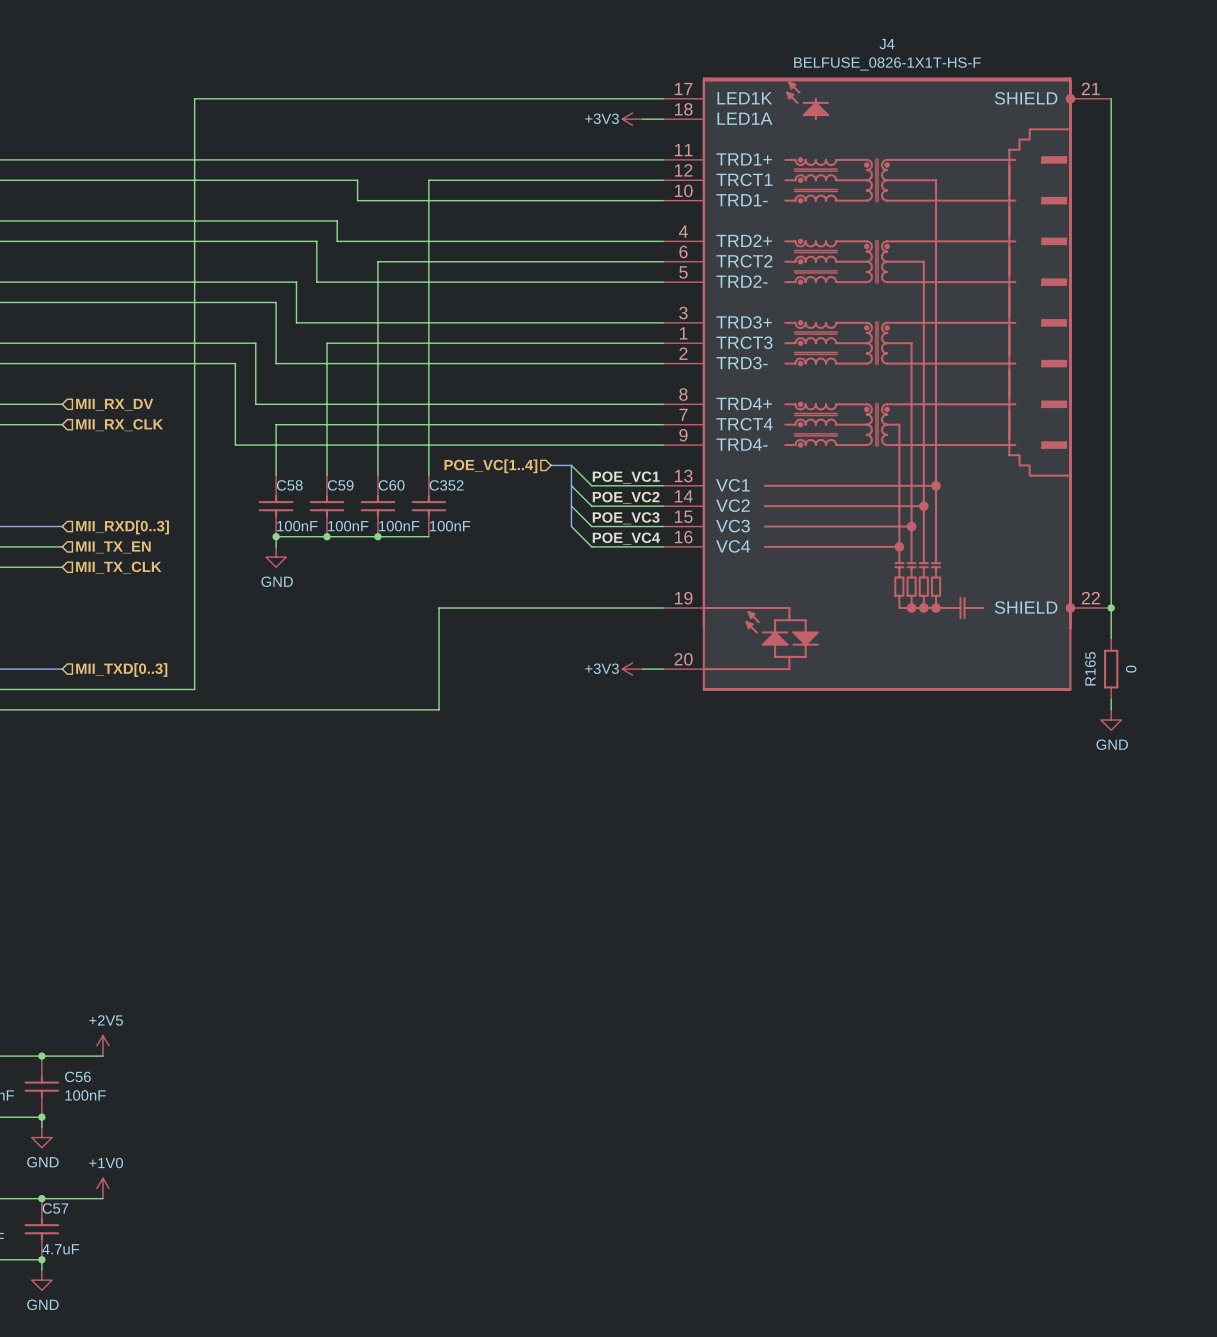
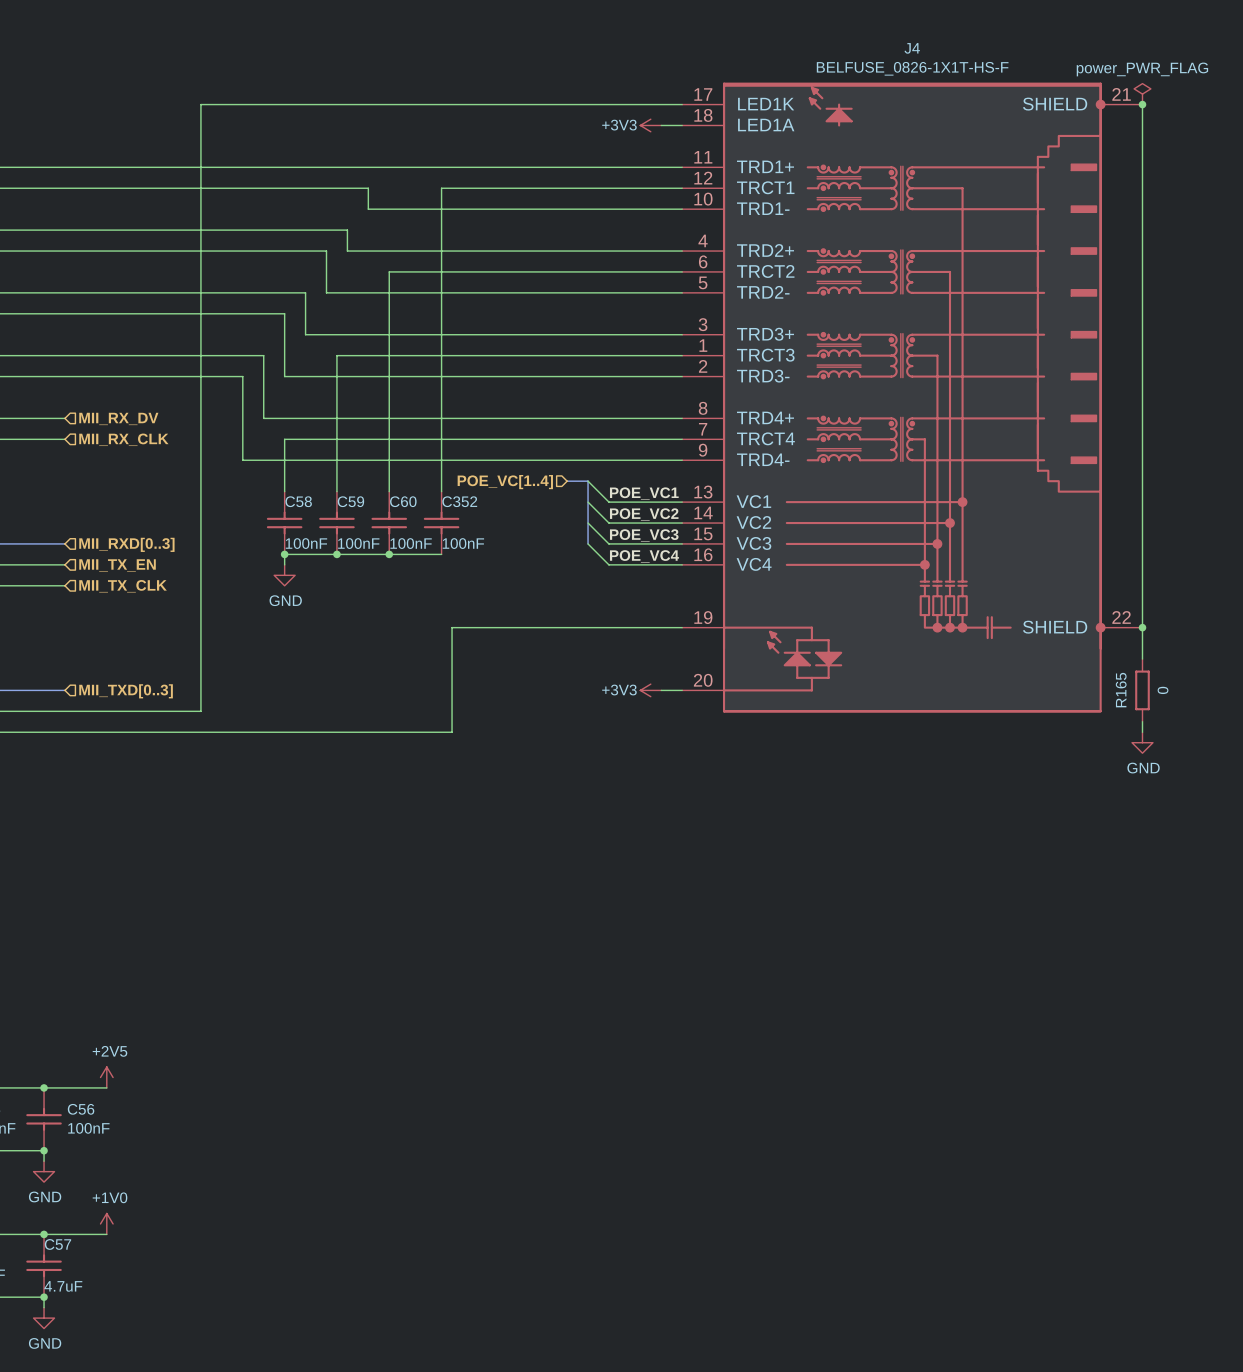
power symbol: none -> power_PWR_FLAG (1142, 94)
junction: none -> (1142, 104)

